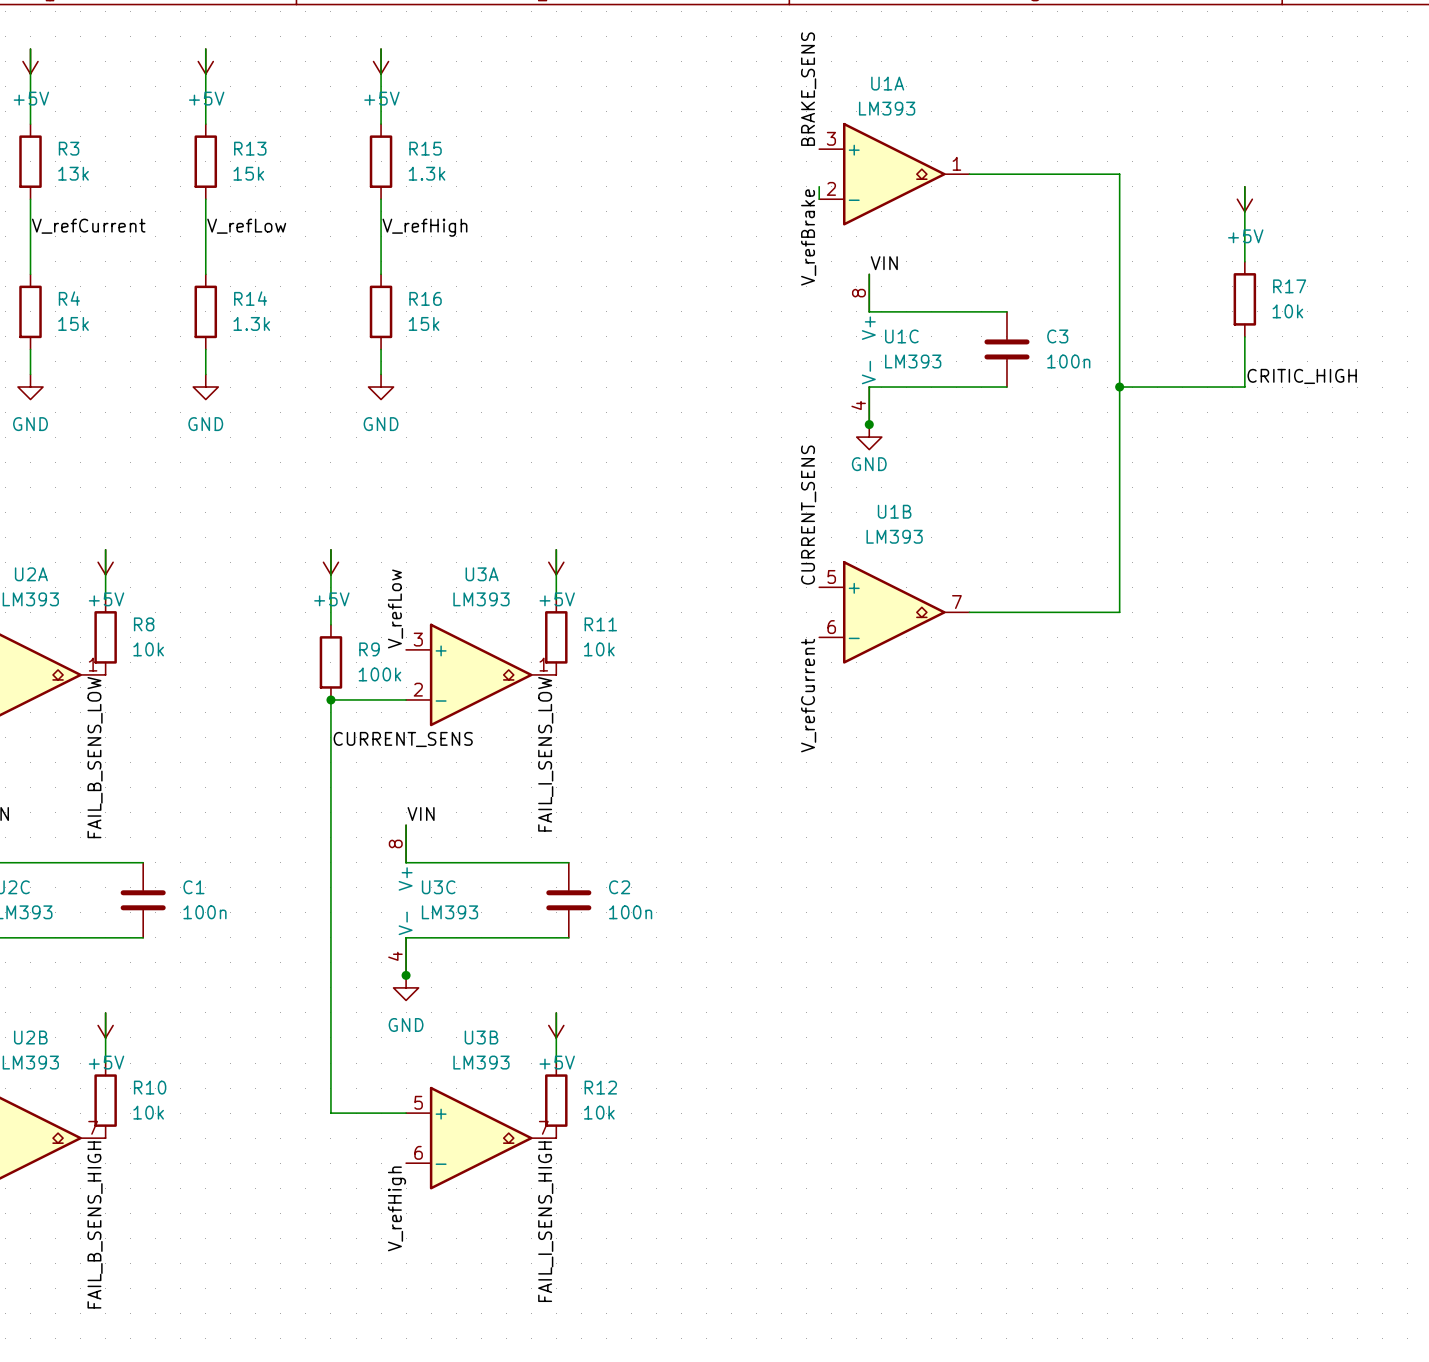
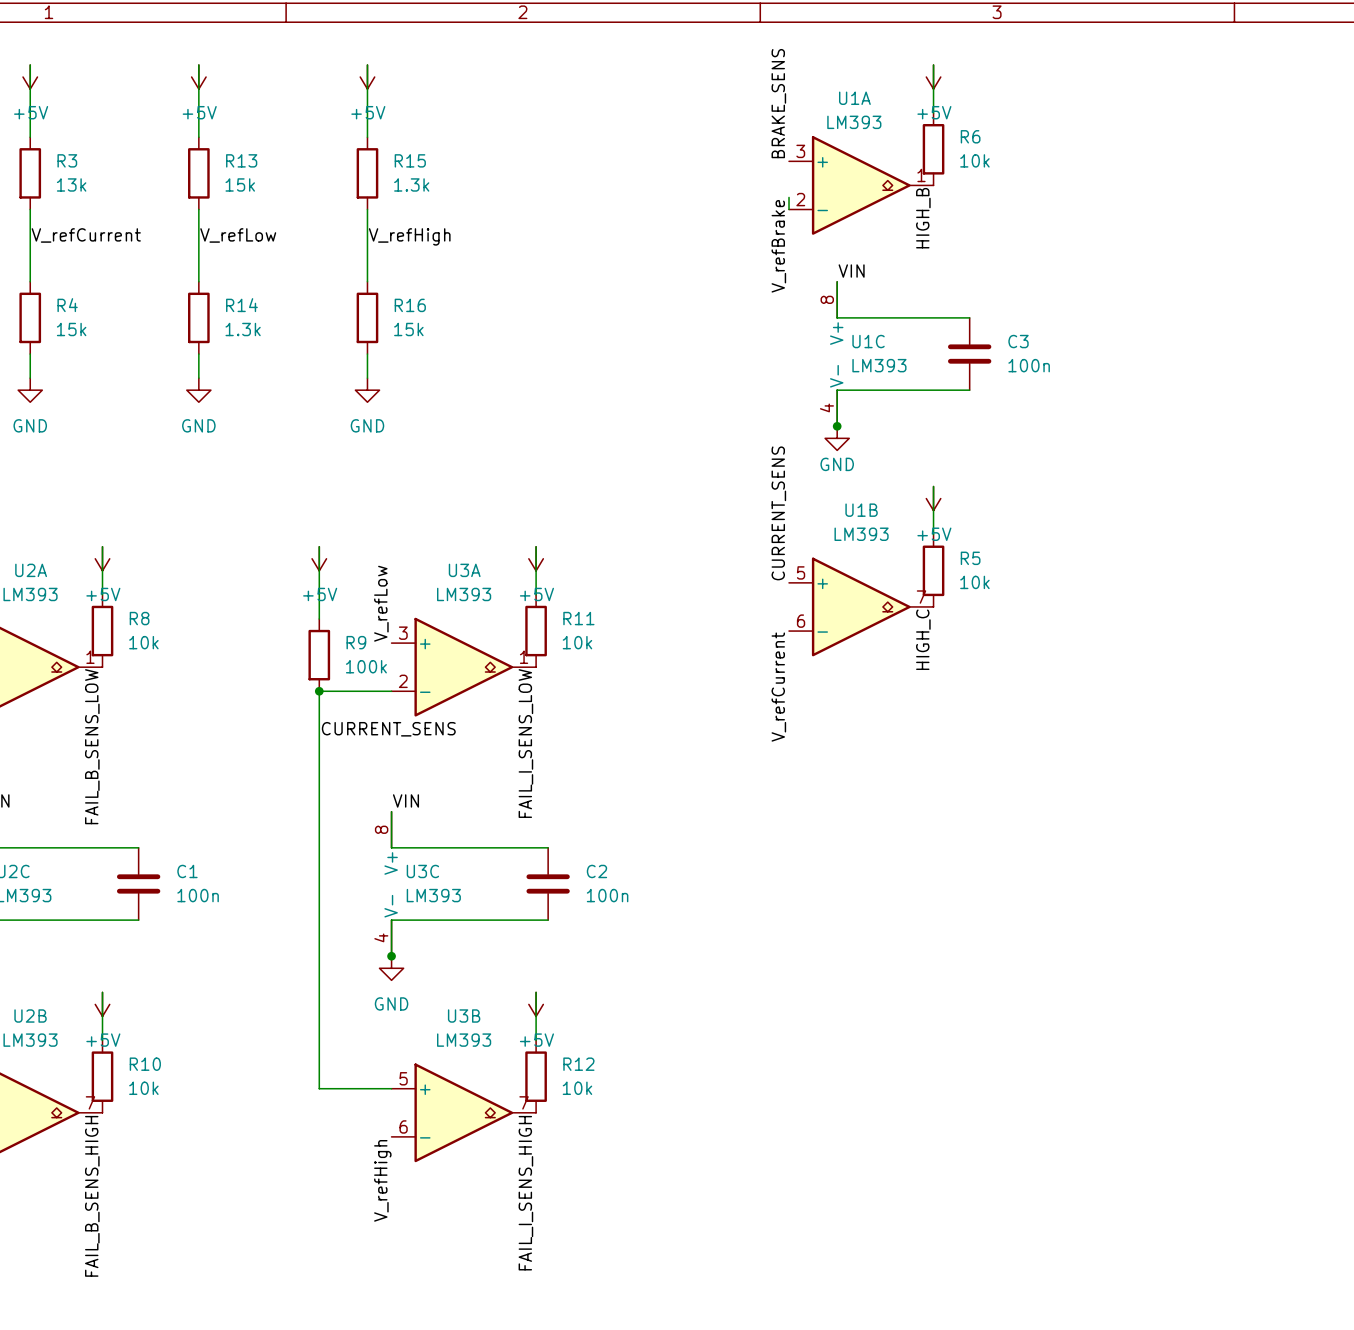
wire: none -> (933, 64) (933, 113)
power symbol: none -> +5V (933, 77)
R6: none -> 10k (933, 149)
wire: (969, 174) (1119, 174) (1119, 612) (969, 612) -> none
wire: (1244, 186) (1244, 261) -> none
power symbol: +5V (1244, 199) -> none
label: none -> HIGH_B (923, 218)
R17: 10k (1244, 299) -> none
wire: (1244, 336) (1244, 387) (1119, 387) -> none
label: CRITIC_HIGH (1302, 376) -> none
junction: (1119, 387) -> none
wire: none -> (933, 486) (933, 534)
power symbol: none -> +5V (933, 498)
R5: none -> 10k (933, 570)
label: none -> HIGH_C (923, 639)

